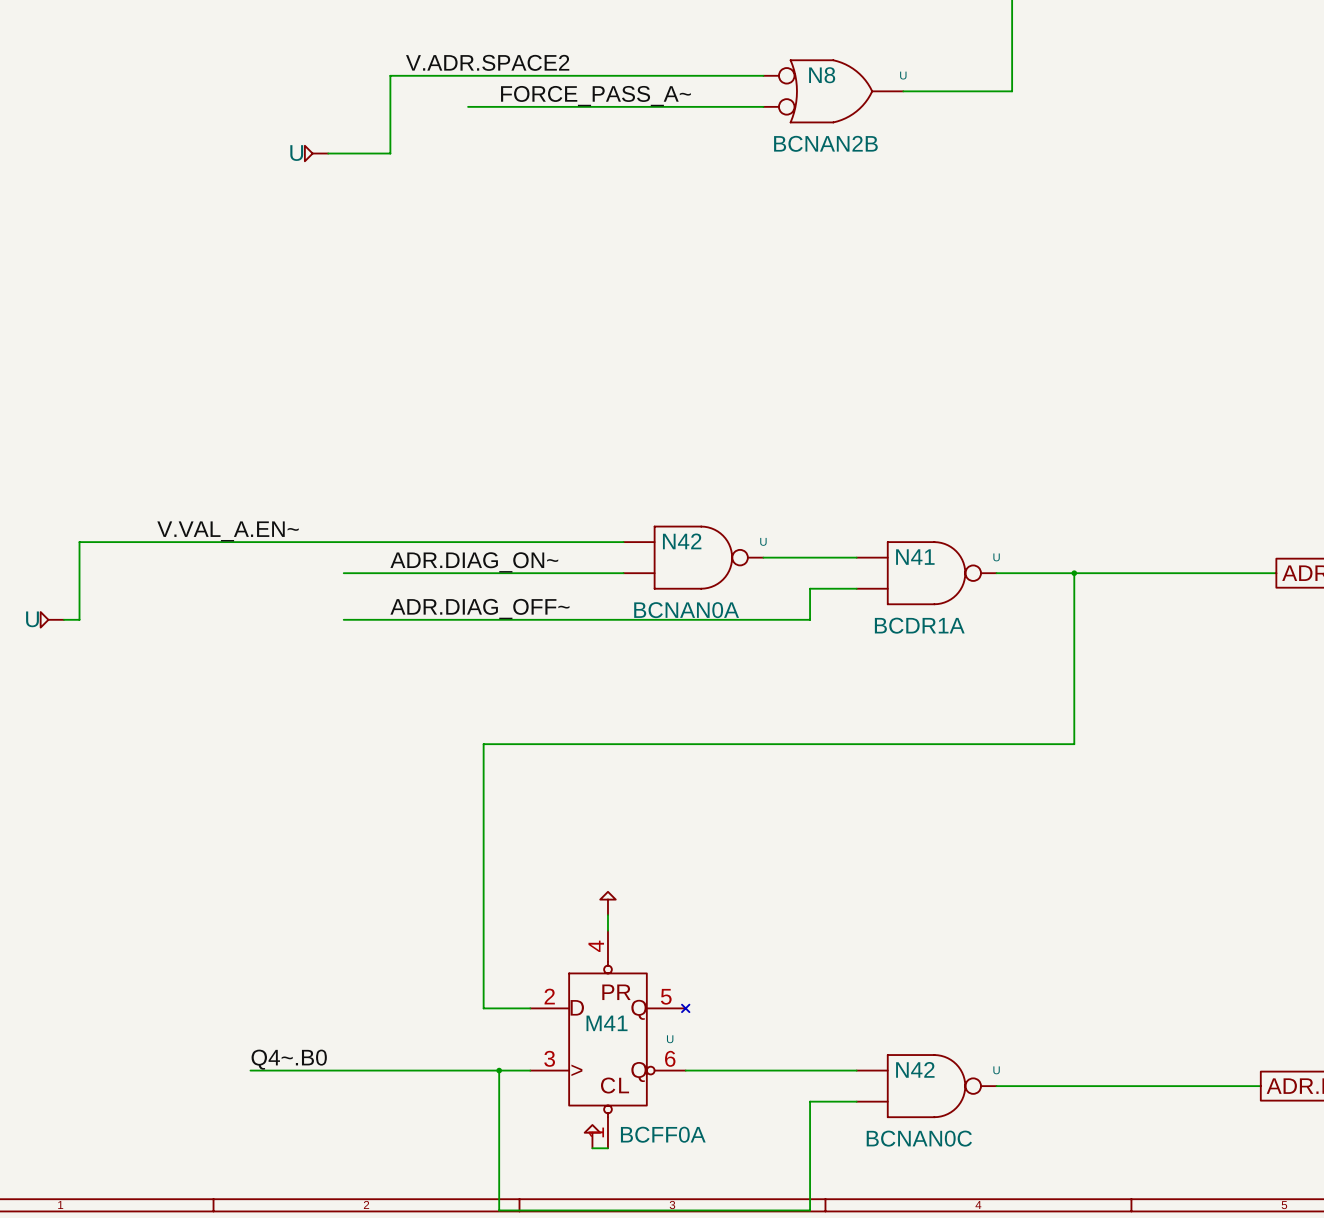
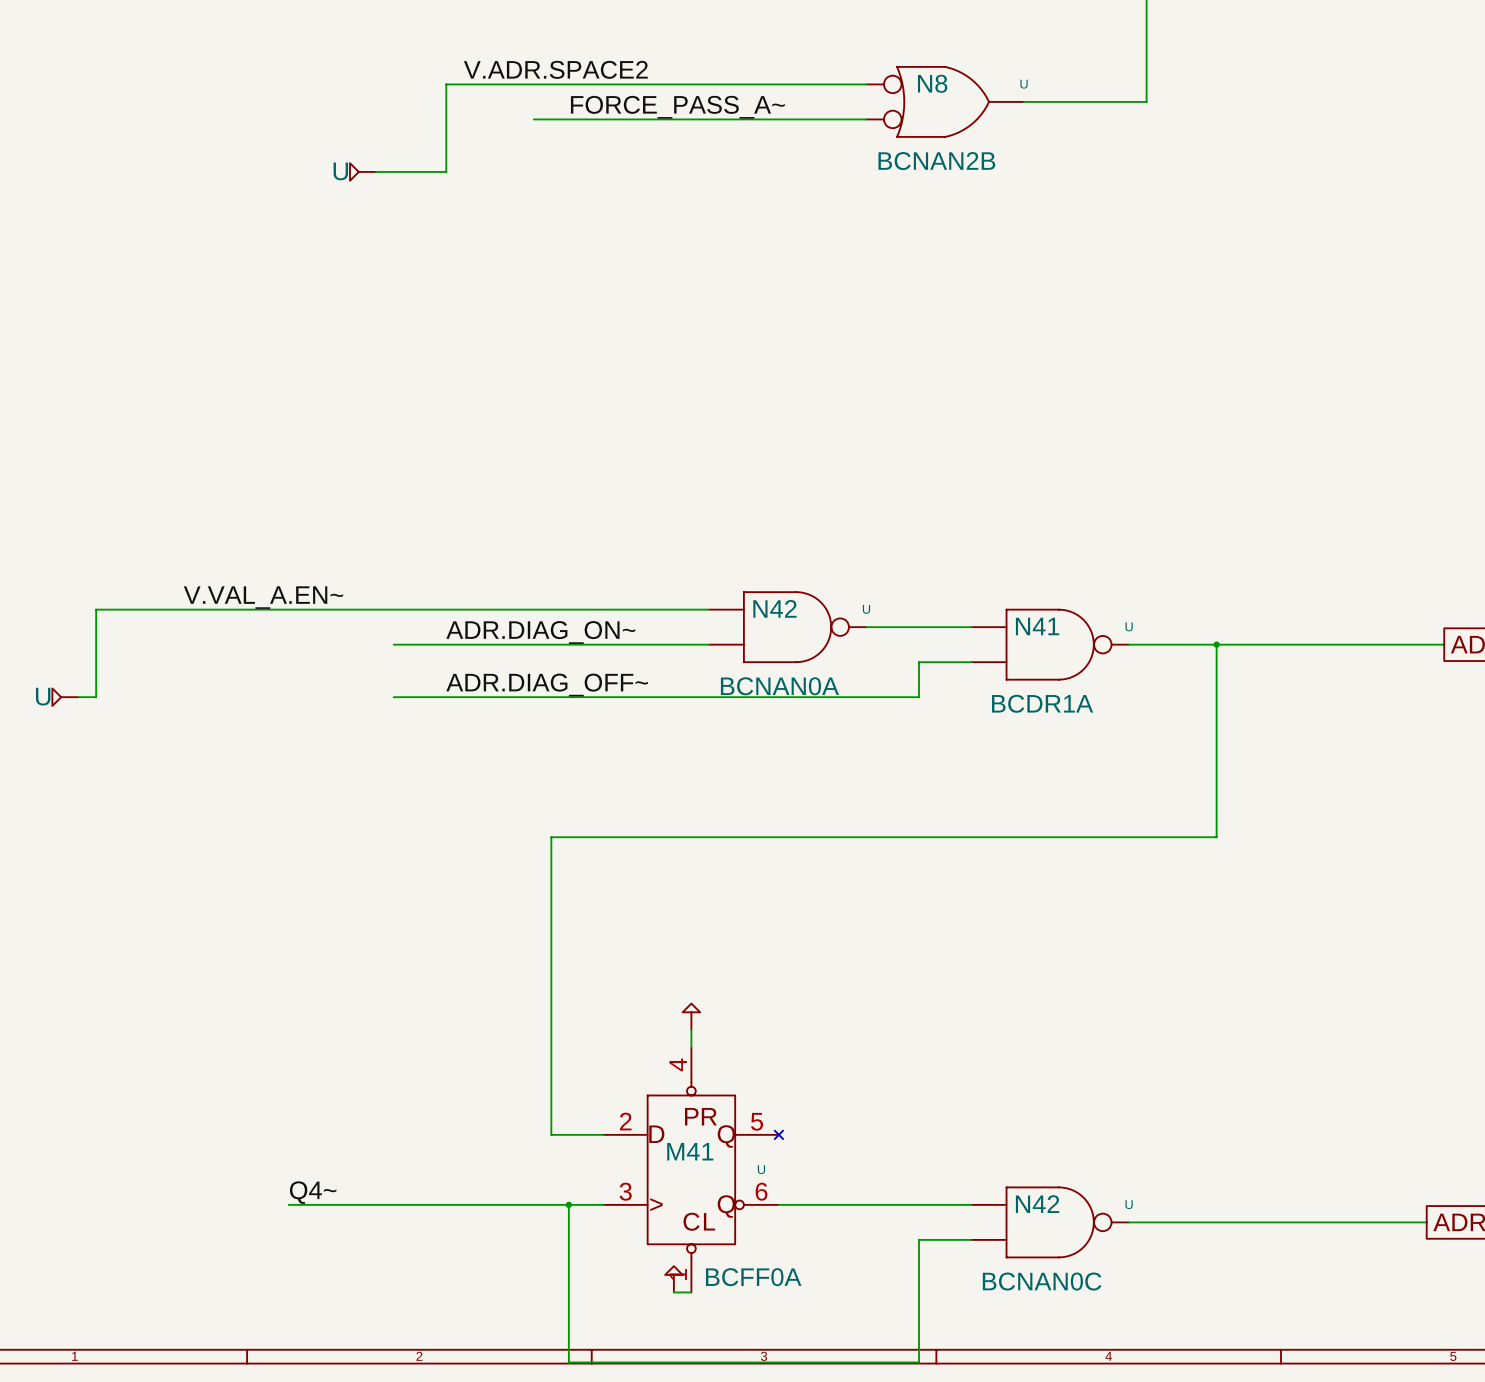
label: Q4~.B0 (289, 1059) -> Q4~ (313, 1192)

